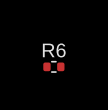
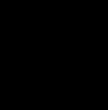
R6: (53, 66) -> none

